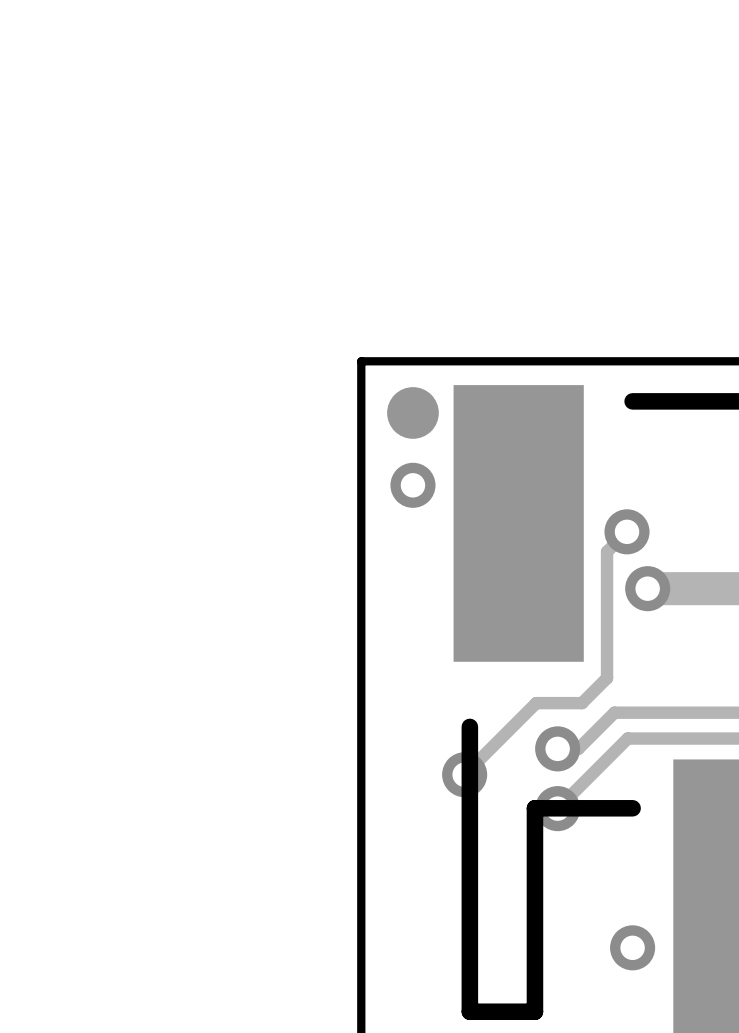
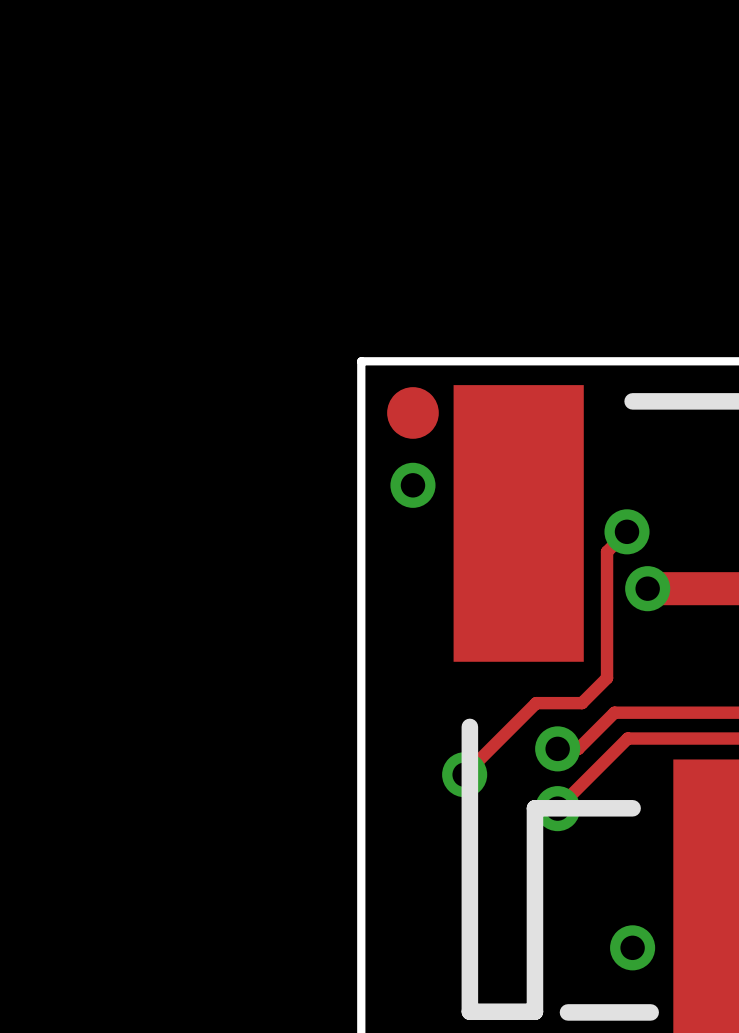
line: none -> (568, 1012) (650, 1012)

